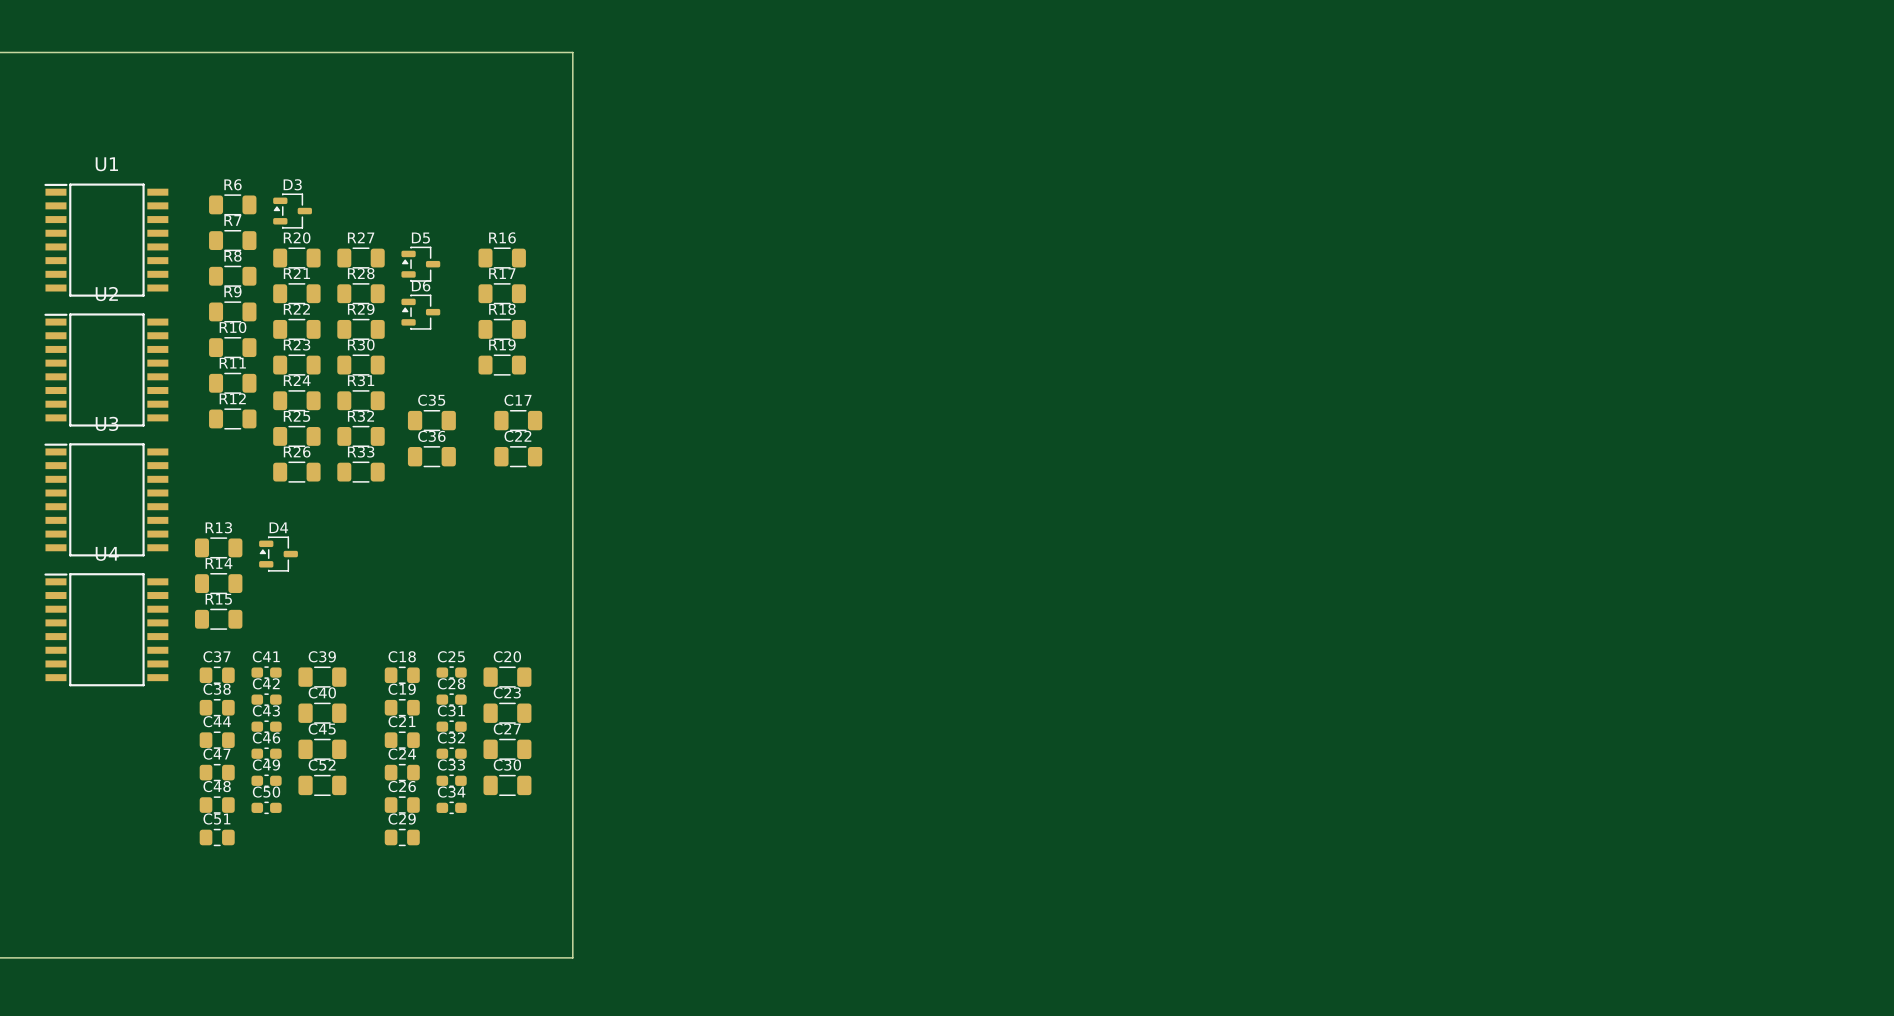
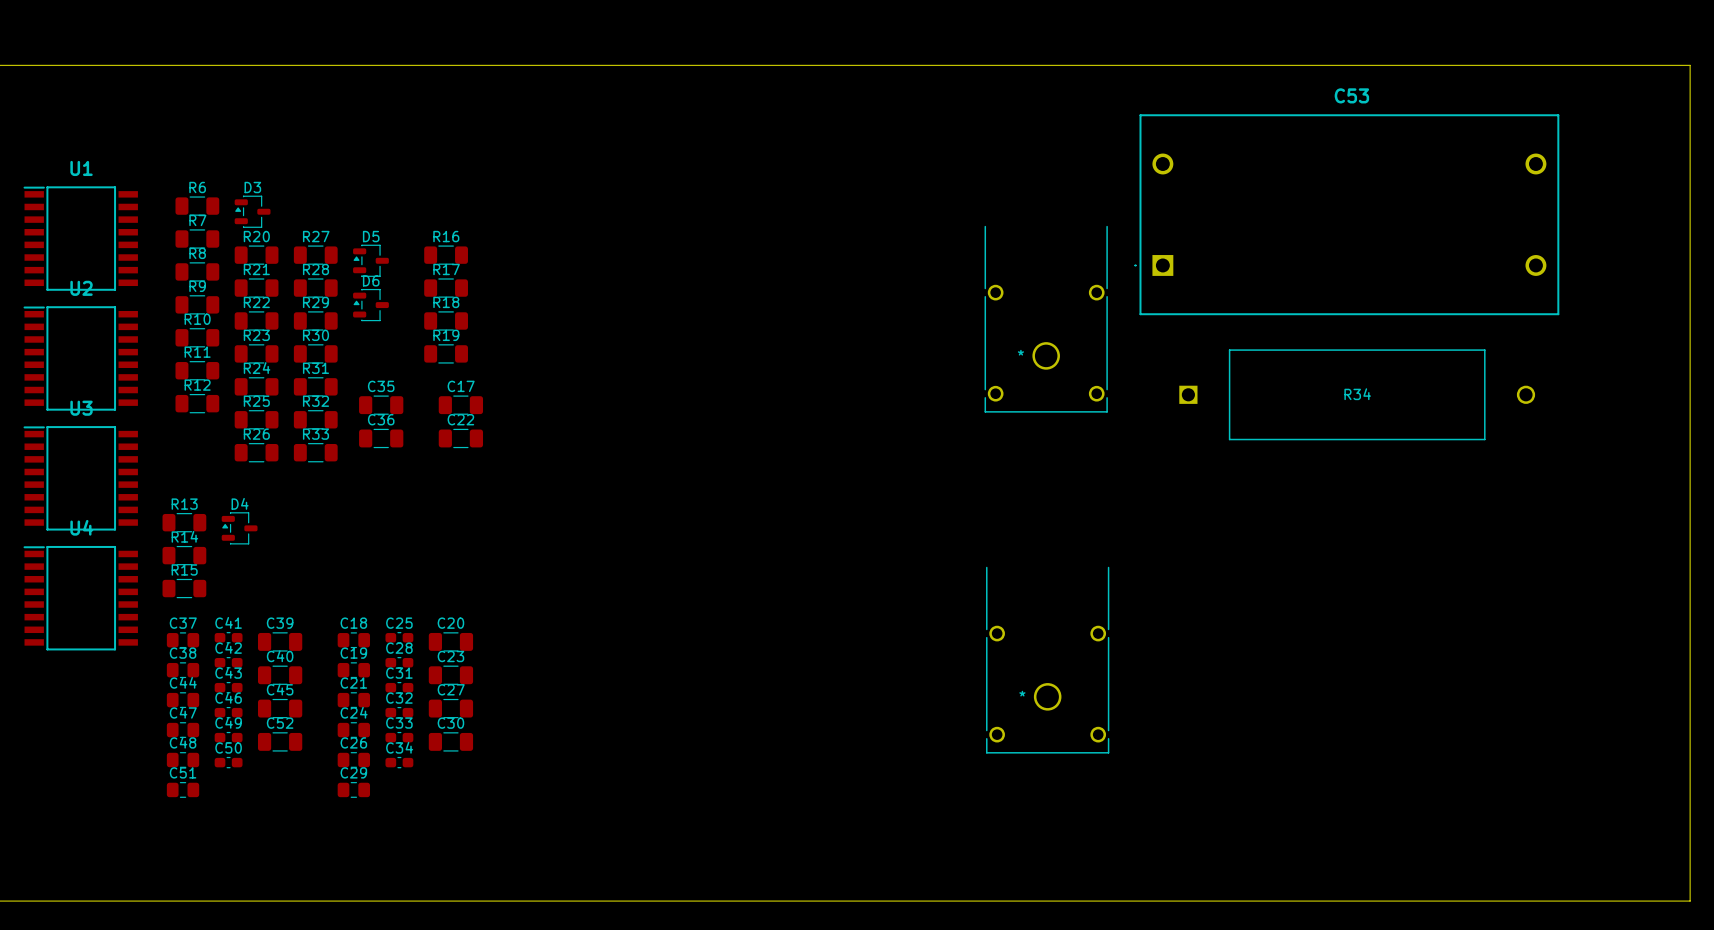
board edge: (572, 52) (572, 957) -> (511, 65) (1690, 65) (1690, 901) (511, 901)
C53: none -> (1346, 214)
part: none -> (1046, 319)
R34: none -> (1357, 394)
part: none -> (1047, 660)

